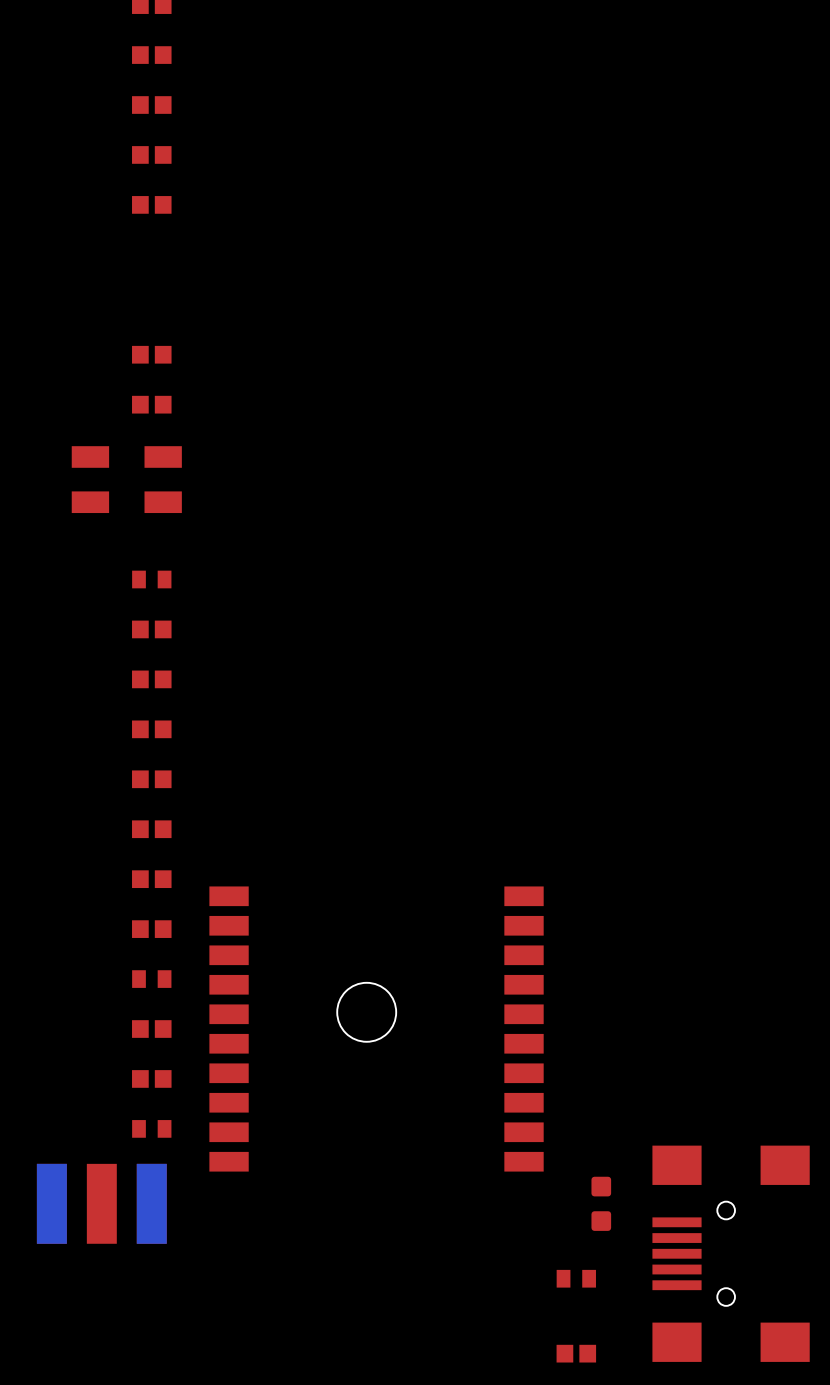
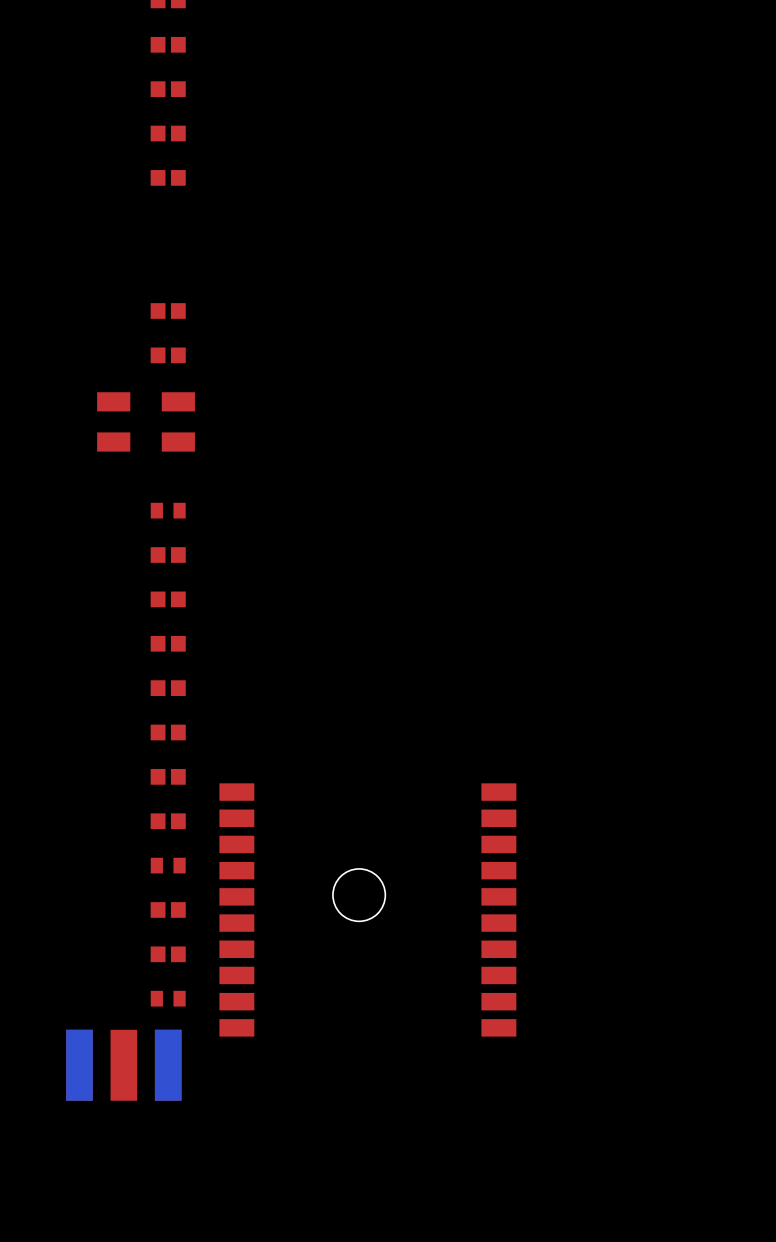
part: (601, 1203) -> none
part: (731, 1253) -> none
part: (576, 1278) -> none
part: (576, 1353) -> none

